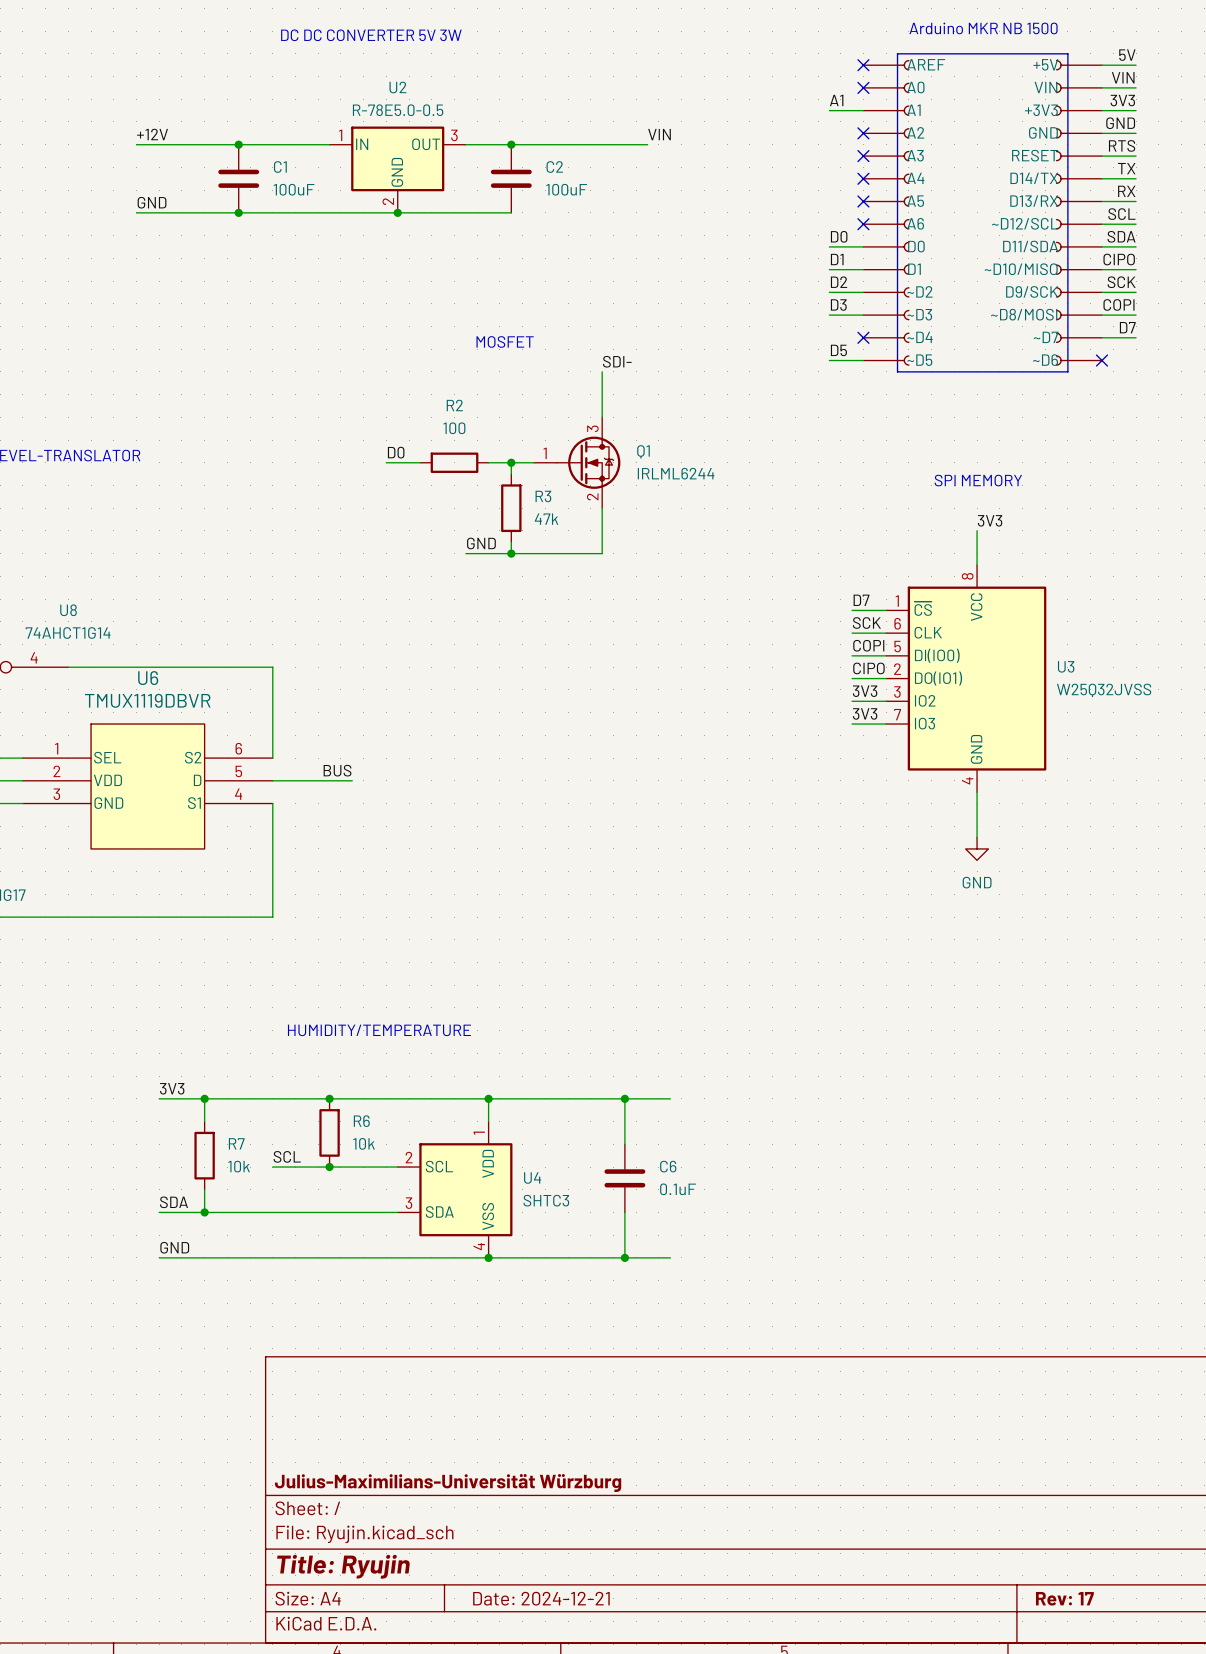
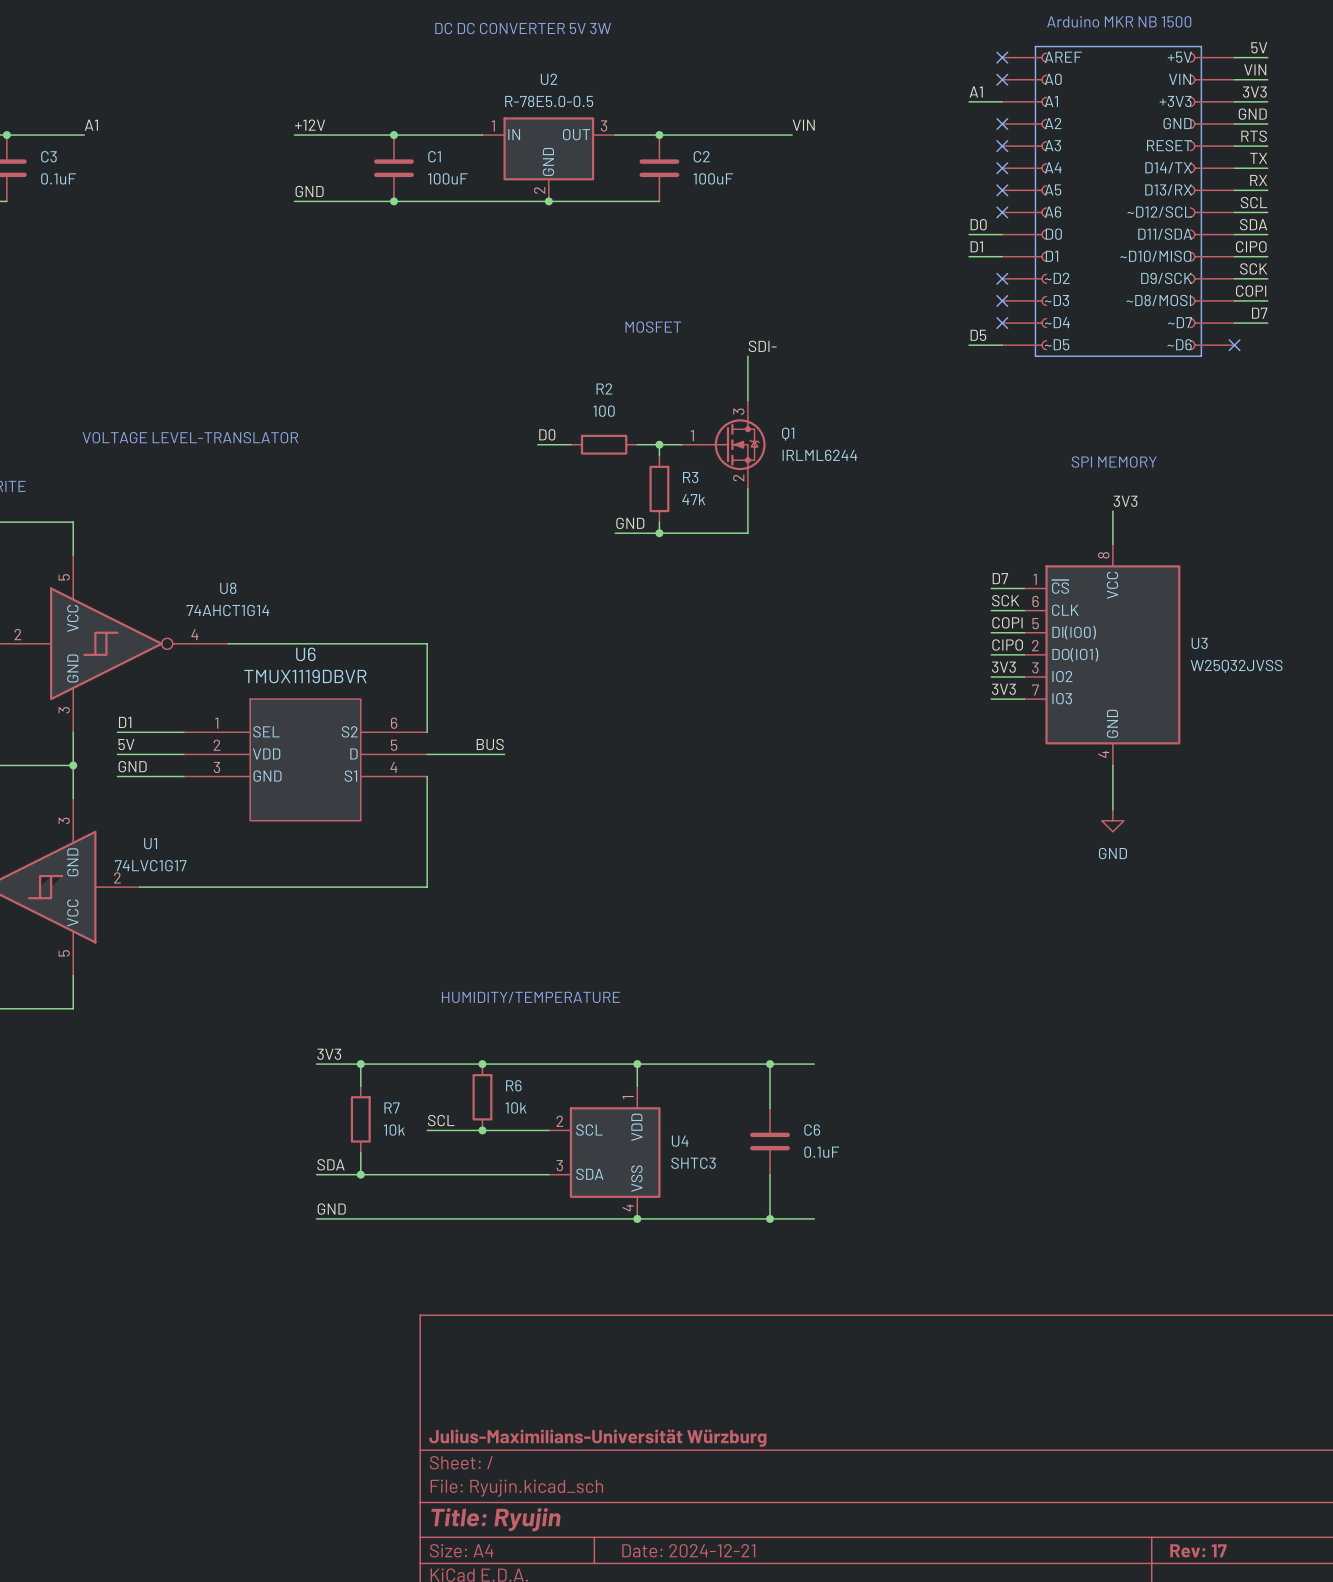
label: D2 (839, 282) -> none
wire: (829, 292) (863, 292) -> none
no-connect mark: none -> (1002, 278)
label: D3 (838, 305) -> none
wire: (829, 315) (863, 315) -> none
no-connect mark: none -> (1002, 300)

